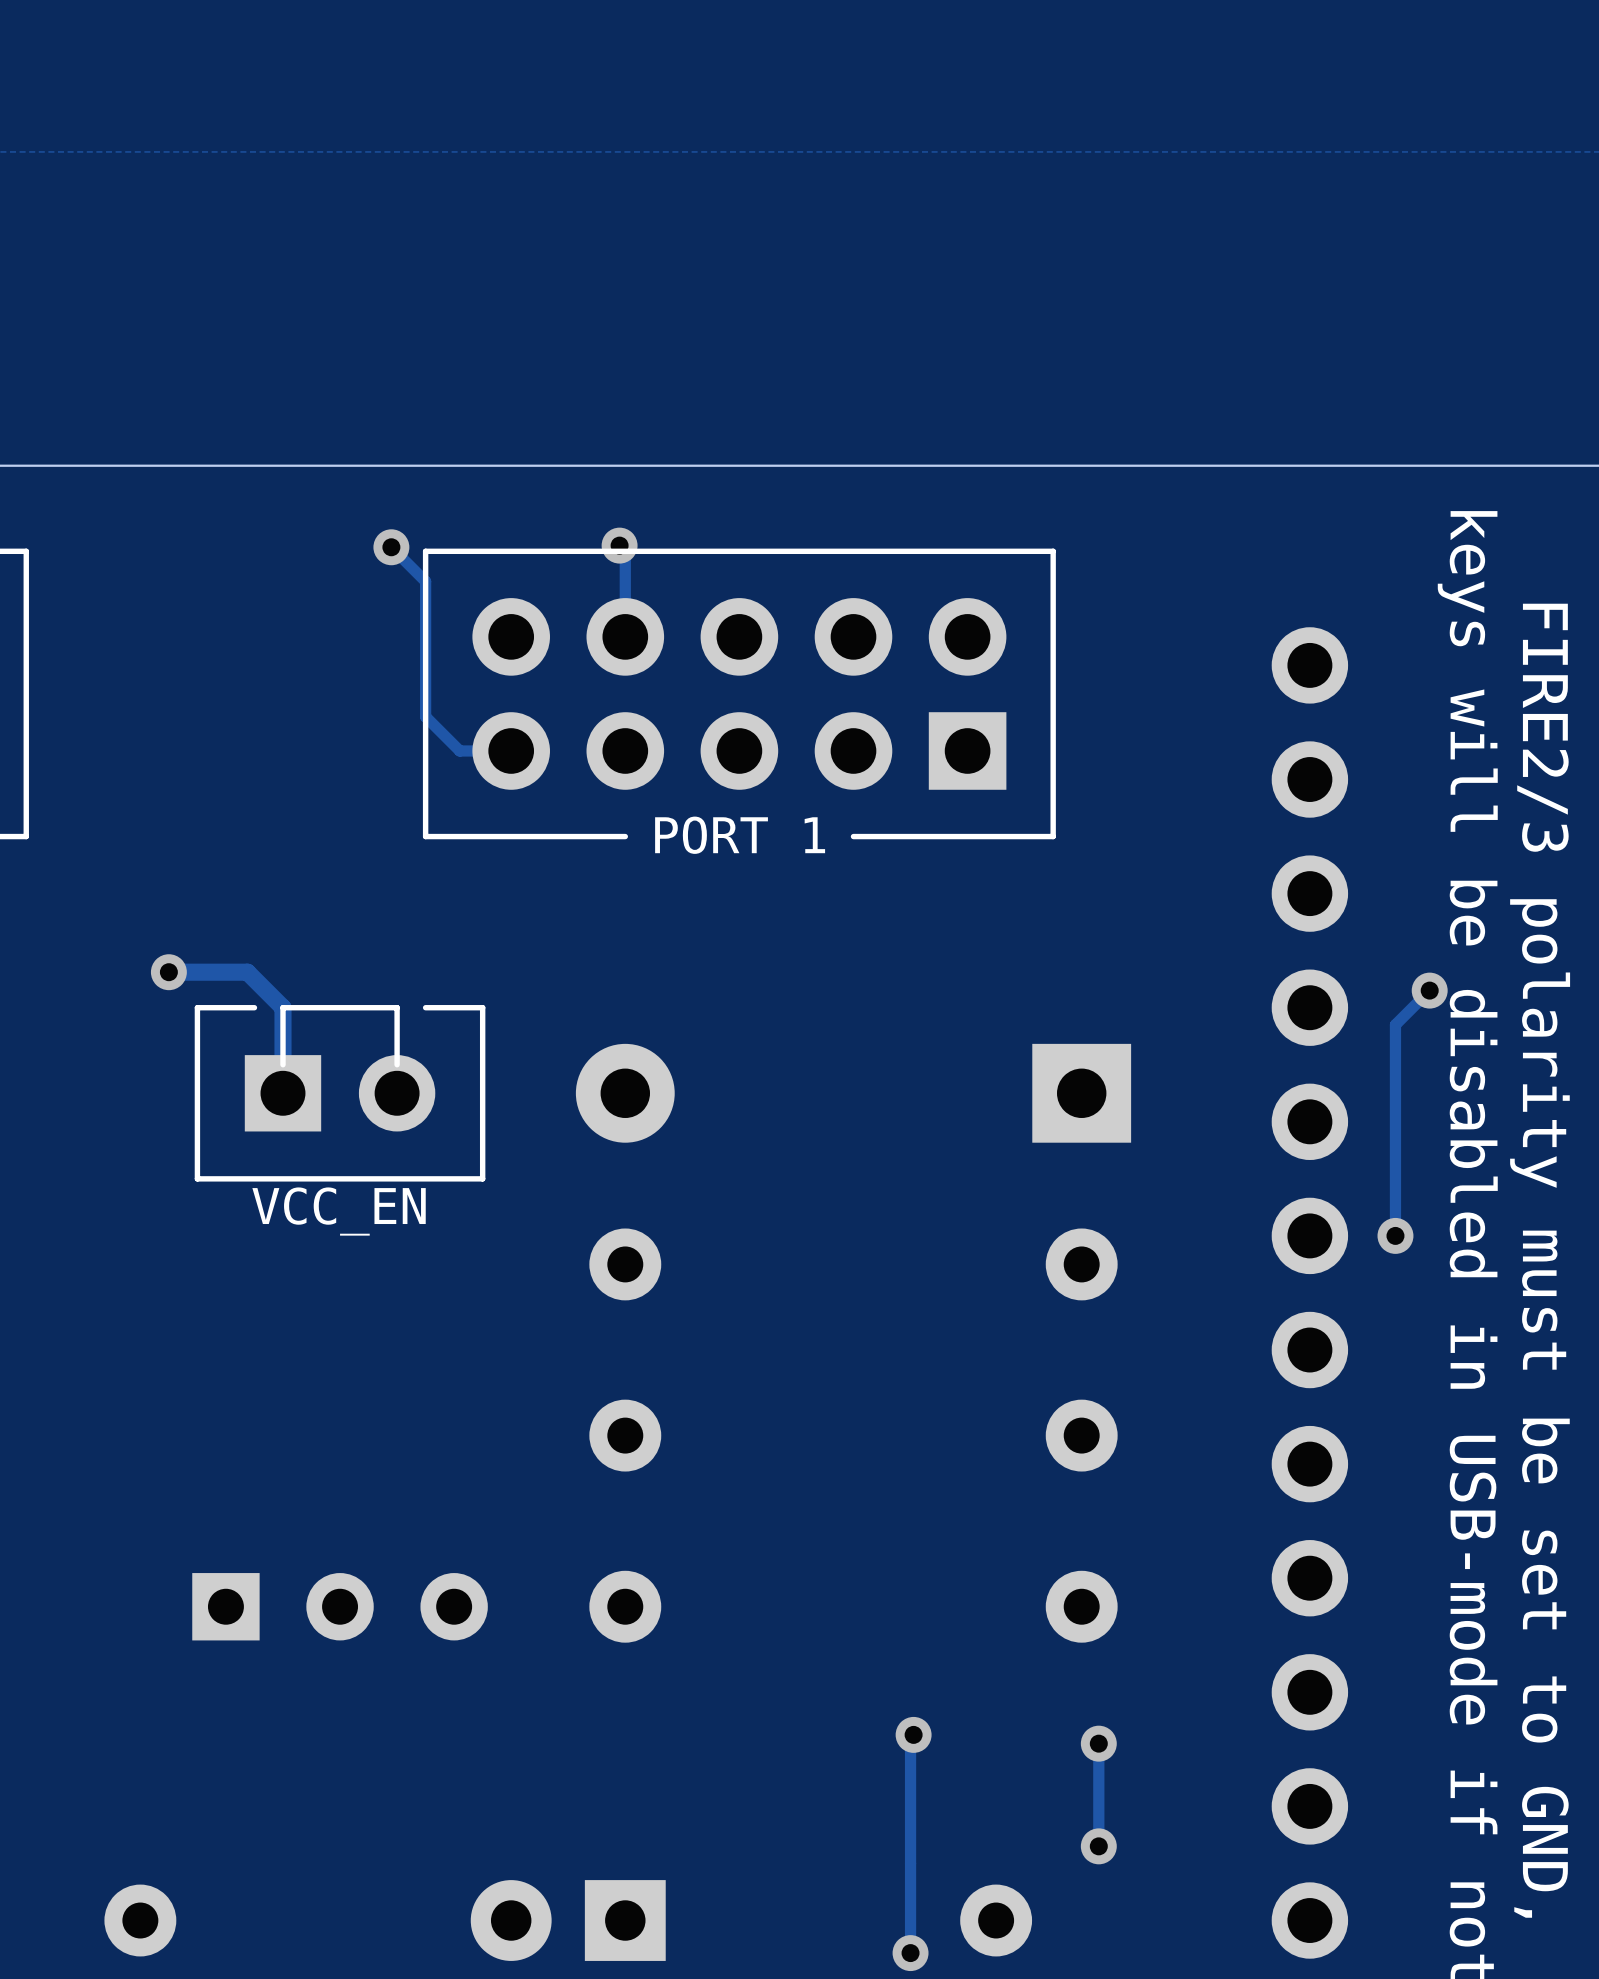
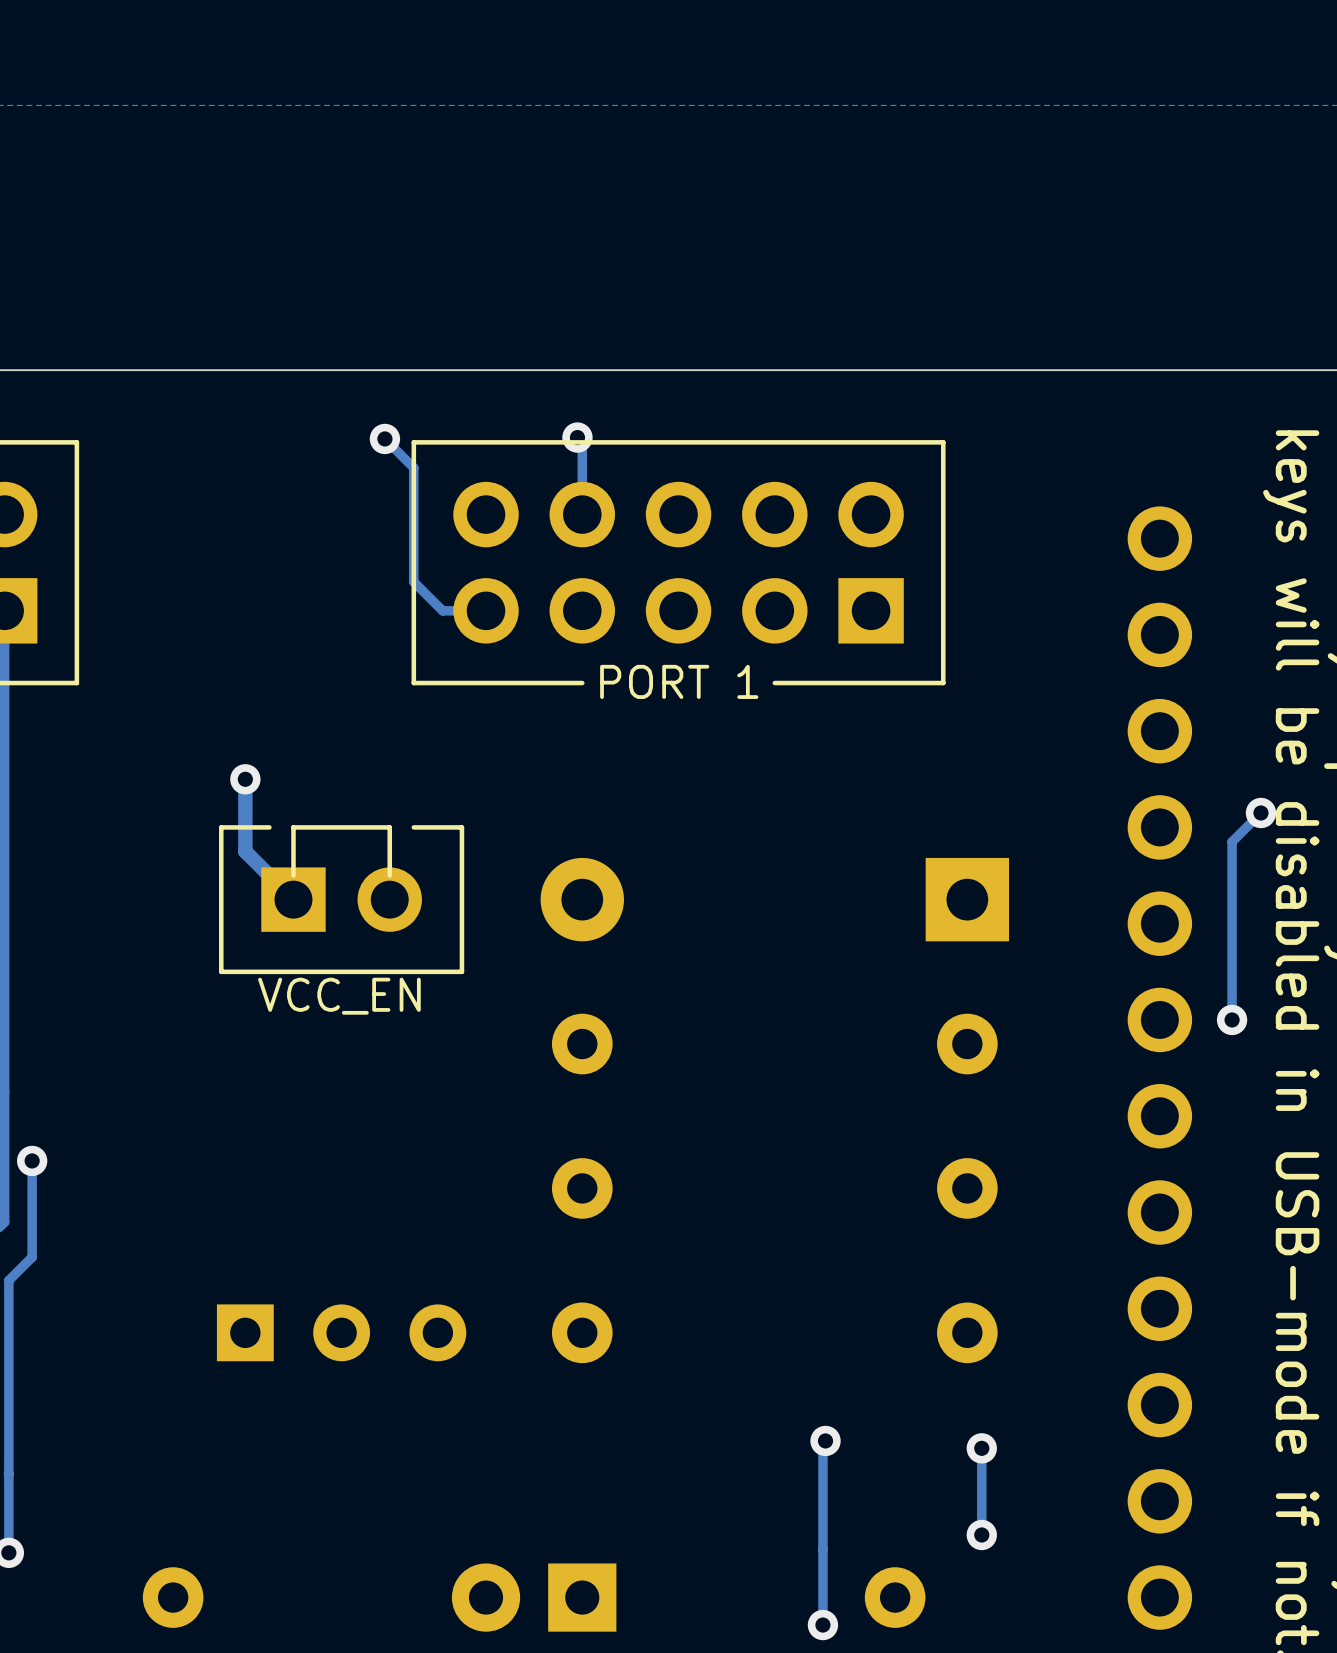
track: (168, 972) (247, 972) (282, 1007) (282, 1093) -> (245, 779) (245, 851) (293, 899)
via position: (168, 972) -> (245, 779)

